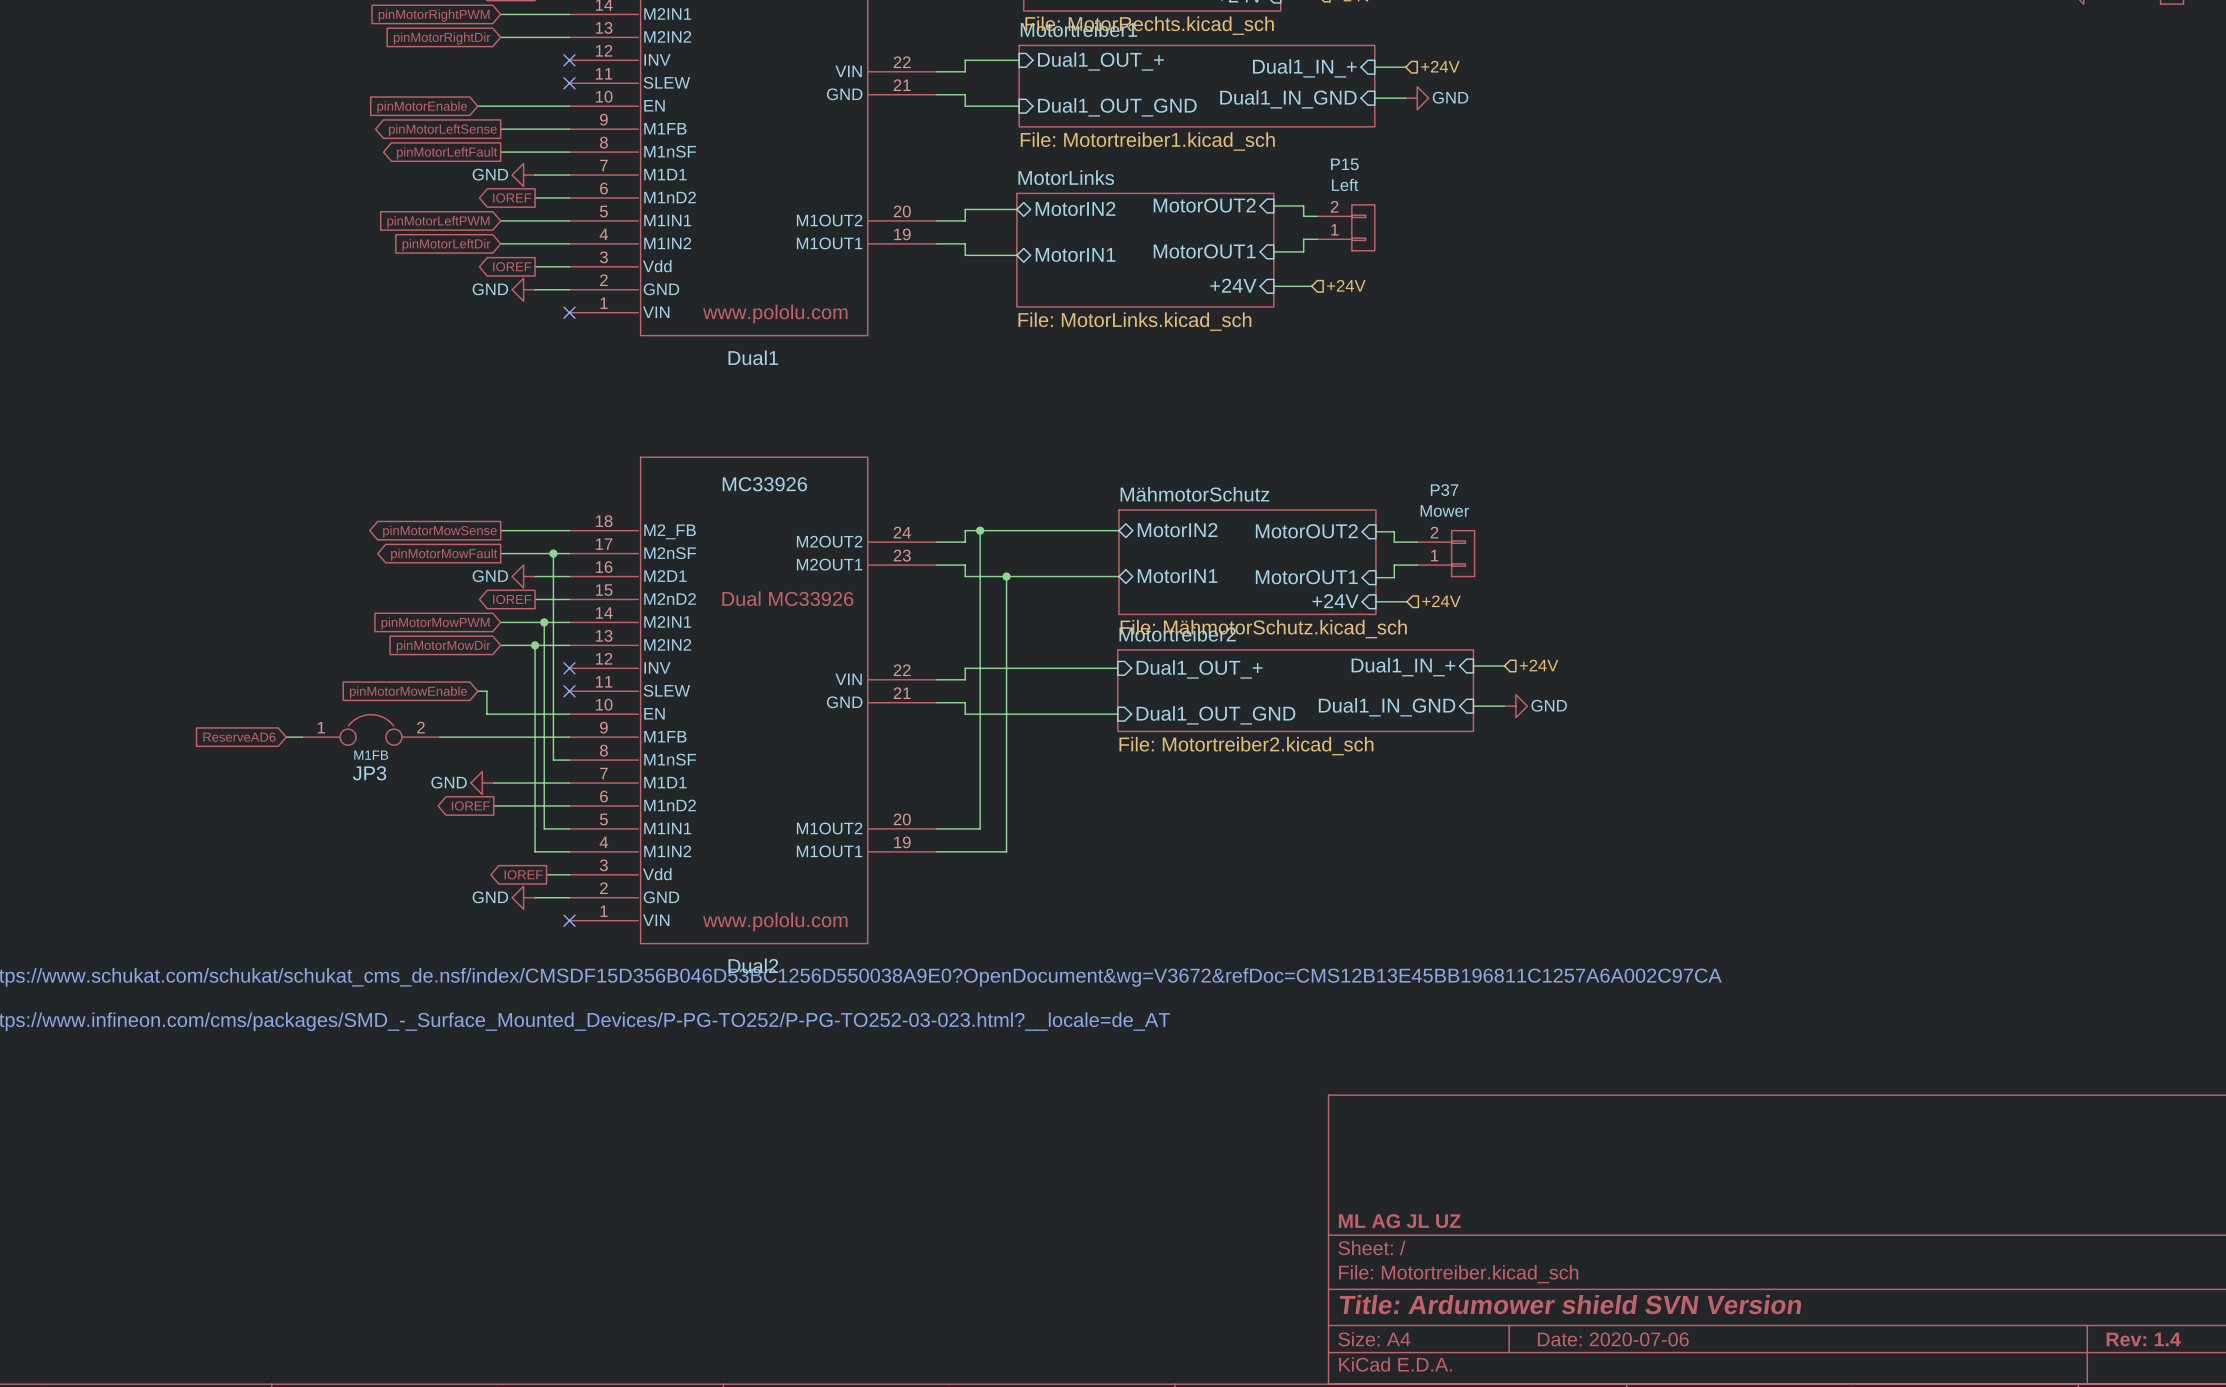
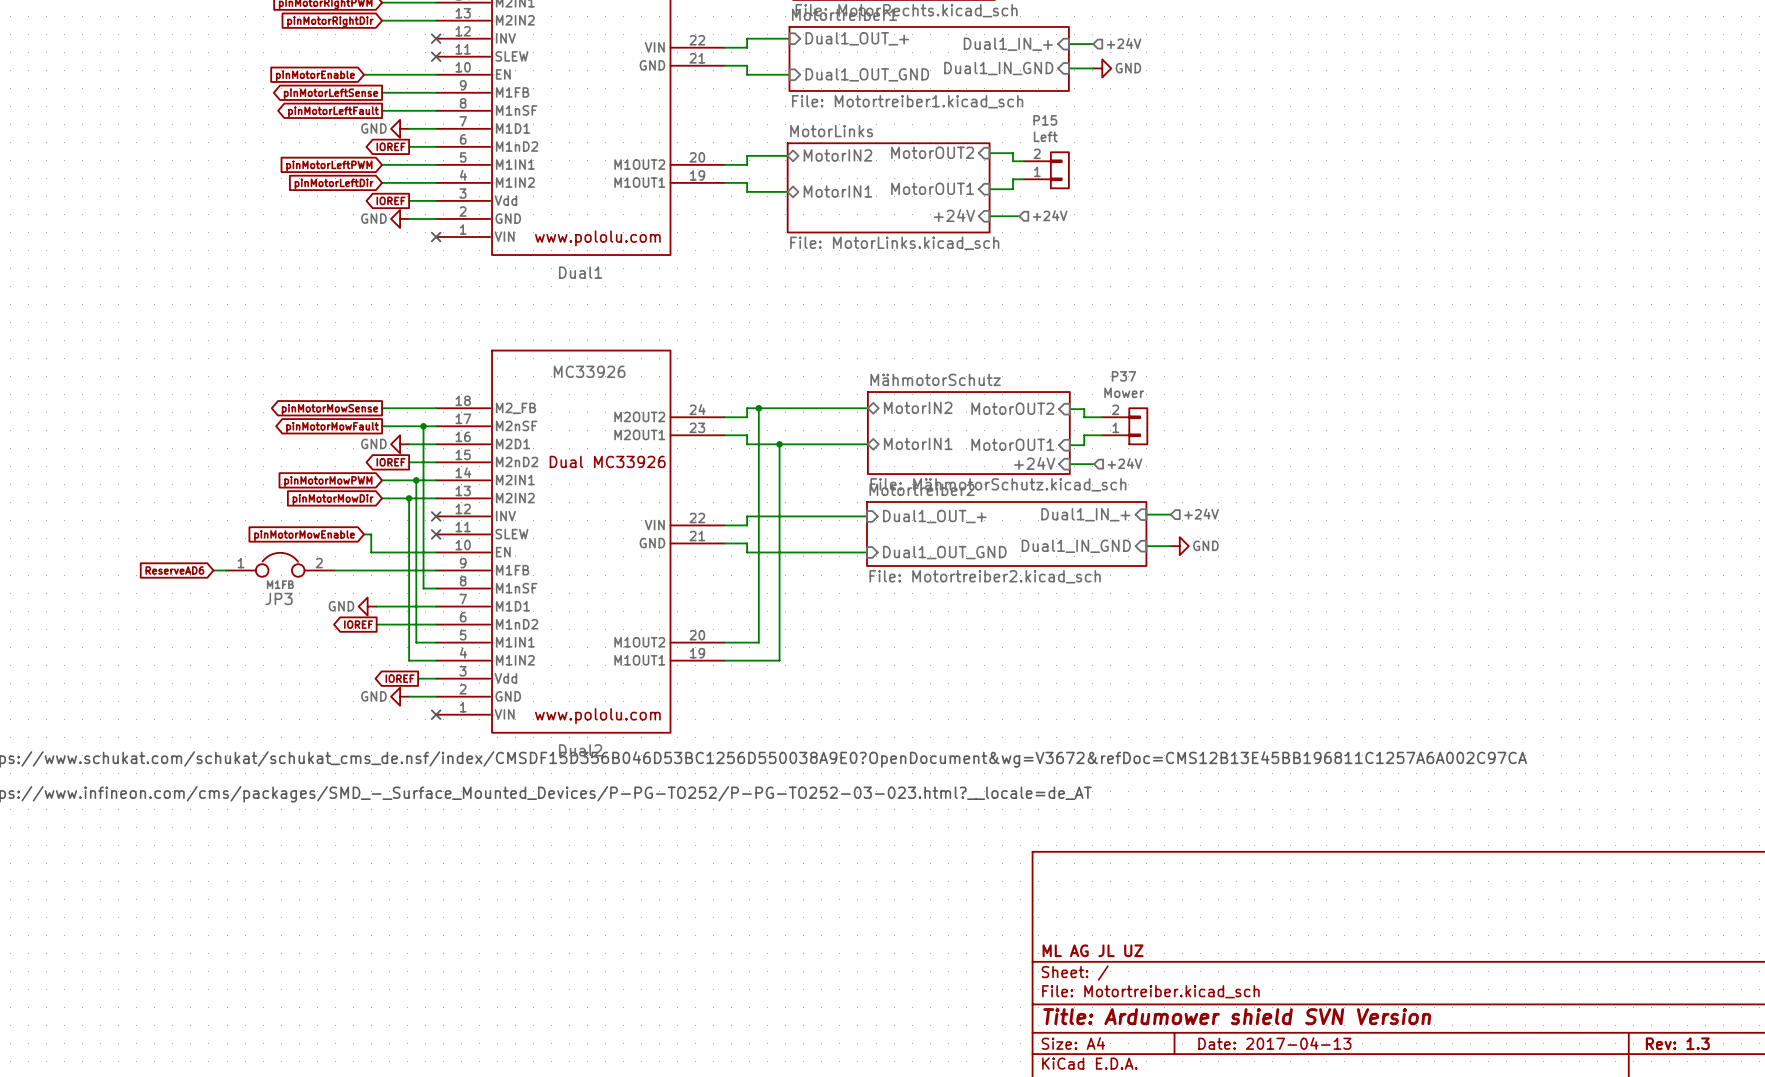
title block: Date: 2020-07-06 (1613, 1339) -> Date: 2017-04-13 (1274, 1043)
title block: Rev: 1.4 (2143, 1339) -> Rev: 1.3 (1677, 1043)

